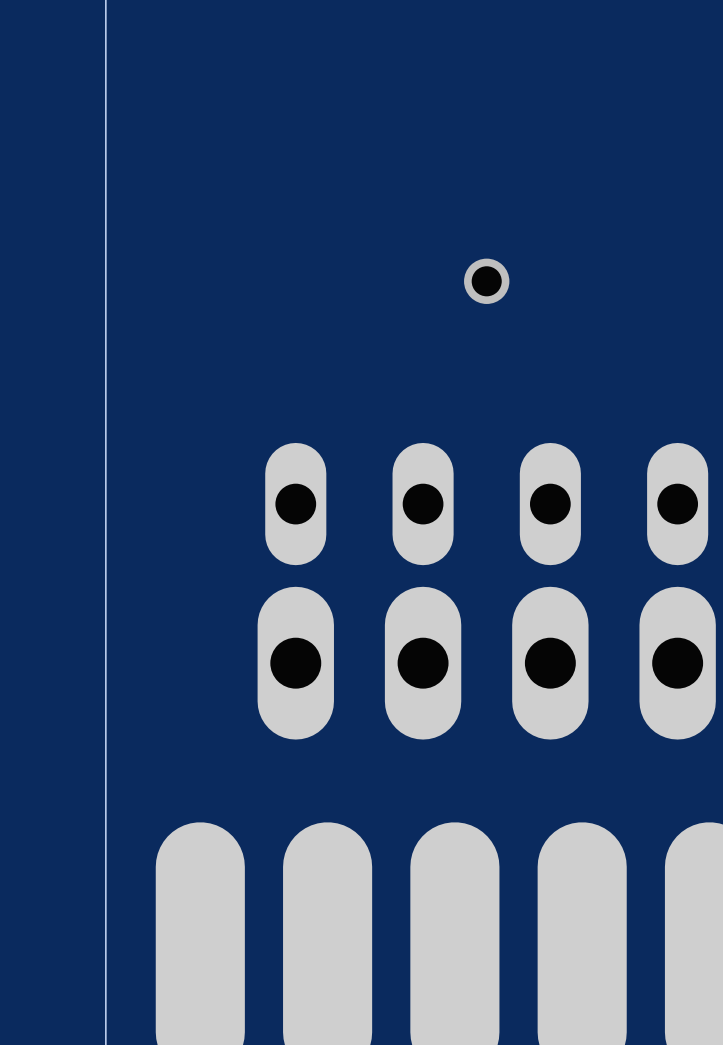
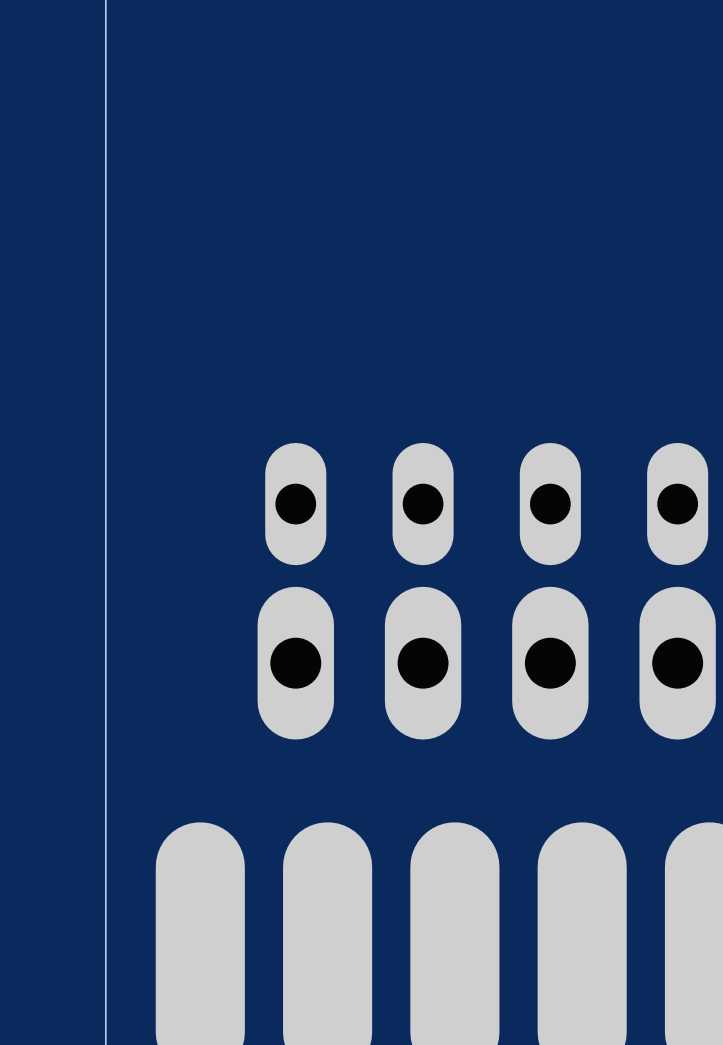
via: (486, 281) -> none

